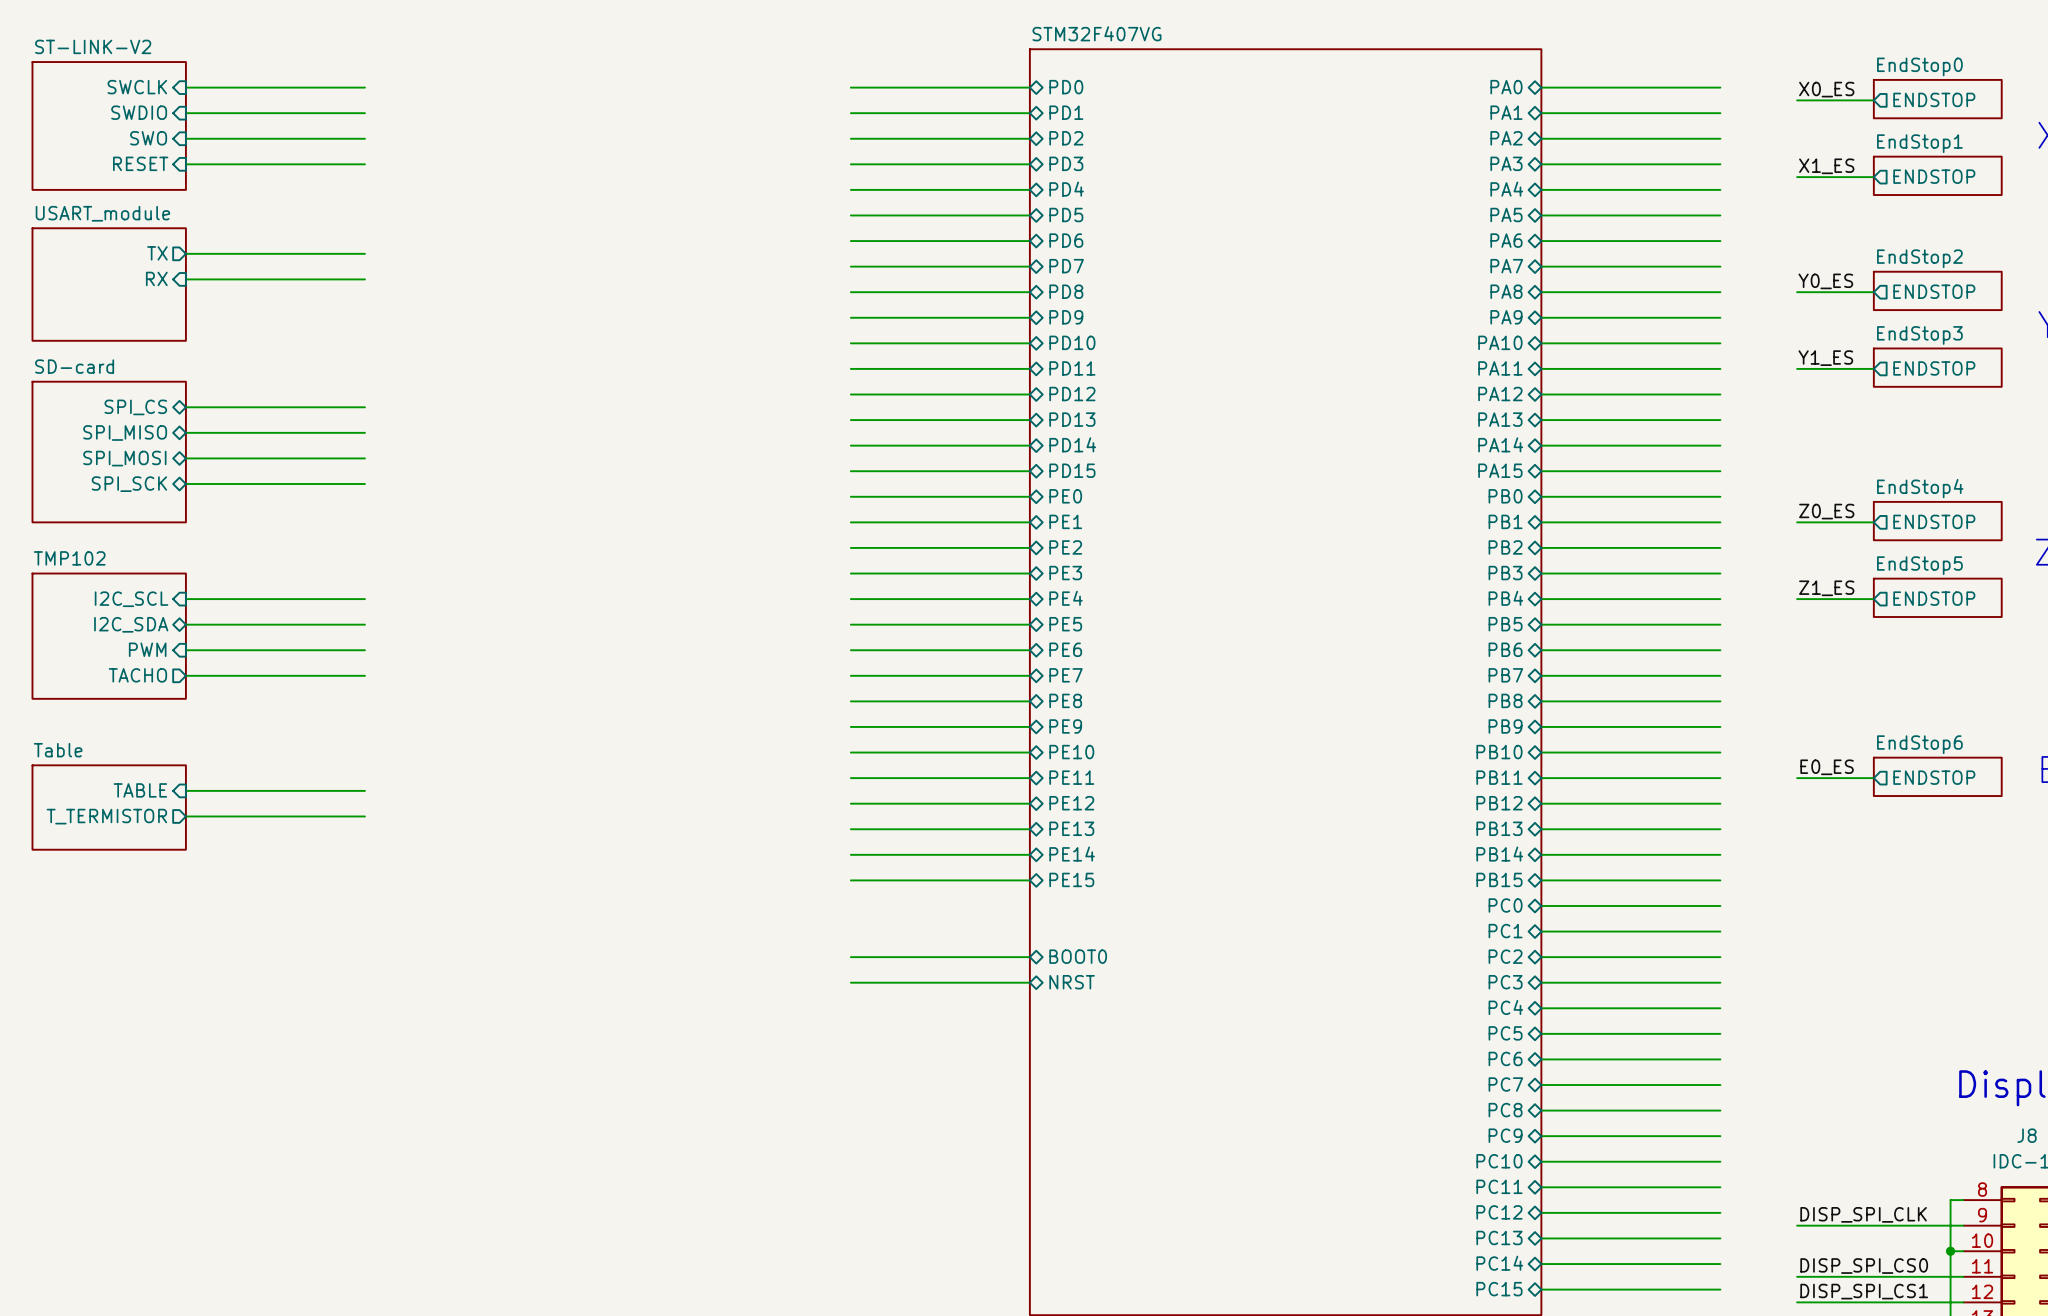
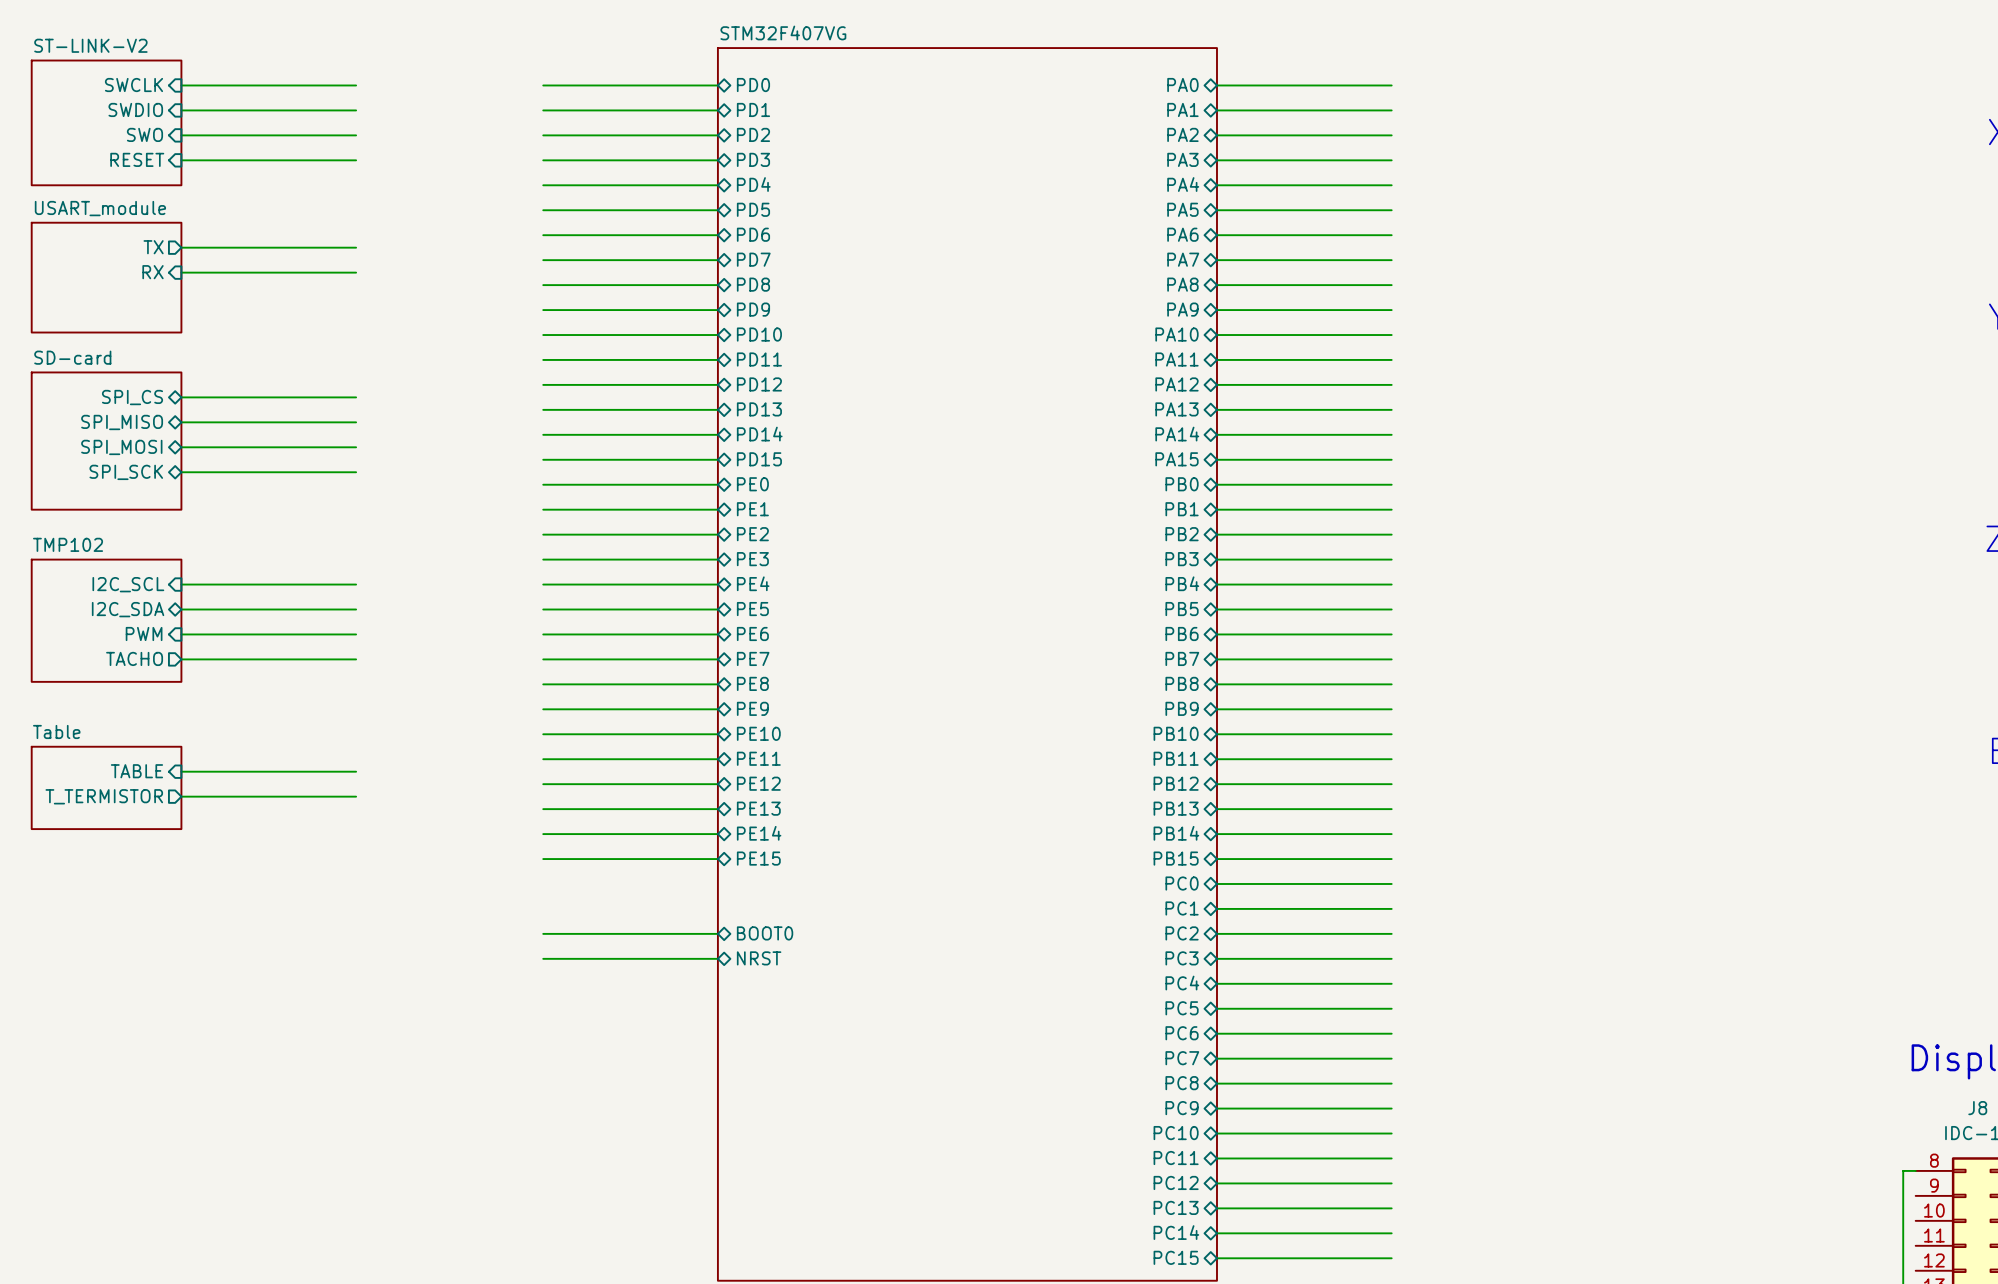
sheet STM32F407VG shape: [1029, 48, 1543, 1316] -> [717, 47, 1218, 1282]
wire: none -> (543, 85) (717, 85)
sheet pin: none -> PD0 (753, 85)
wire: (850, 87) (1029, 87) -> none
sheet pin: PD0 (1066, 87) -> none
sheet pin: none -> PA0 (1182, 85)
wire: none -> (1216, 85) (1391, 85)
sheet pin: PA0 (1506, 87) -> none
wire: (1541, 87) (1720, 87) -> none
label: X0_ES (1826, 89) -> none
sheet pin: ENDSTOP (1934, 99) -> none
sheet EndStop0: (1937, 99) -> none
wire: (1797, 100) (1873, 100) -> none
sheet pin: none -> PD1 (753, 109)
sheet pin: PD1 (1066, 112) -> none
sheet pin: none -> PA1 (1182, 109)
sheet pin: PA1 (1506, 112) -> none
wire: none -> (543, 110) (717, 110)
wire: (850, 113) (1029, 113) -> none
wire: none -> (1216, 110) (1391, 110)
wire: (1541, 113) (1720, 113) -> none
wire: none -> (543, 135) (717, 135)
sheet pin: none -> PD2 (753, 134)
wire: (850, 138) (1029, 138) -> none
sheet pin: PD2 (1066, 138) -> none
sheet pin: none -> PA2 (1182, 134)
wire: none -> (1216, 135) (1391, 135)
sheet pin: PA2 (1506, 138) -> none
wire: (1541, 138) (1720, 138) -> none
sheet pin: none -> PD3 (753, 159)
sheet pin: PD3 (1066, 163) -> none
sheet pin: none -> PA3 (1182, 159)
sheet pin: PA3 (1506, 163) -> none
wire: none -> (543, 160) (717, 160)
wire: (850, 164) (1029, 164) -> none
wire: none -> (1216, 160) (1391, 160)
wire: (1541, 164) (1720, 164) -> none
label: X1_ES (1826, 166) -> none
sheet EndStop1: (1937, 175) -> none
sheet pin: ENDSTOP (1934, 176) -> none
wire: (1797, 177) (1873, 177) -> none
wire: none -> (543, 185) (717, 185)
sheet pin: none -> PD4 (753, 184)
wire: (850, 189) (1029, 189) -> none
sheet pin: PD4 (1066, 189) -> none
sheet pin: none -> PA4 (1183, 184)
wire: none -> (1216, 185) (1391, 185)
sheet pin: PA4 (1506, 189) -> none
wire: (1541, 189) (1720, 189) -> none
wire: none -> (543, 210) (717, 210)
sheet pin: none -> PD5 (753, 209)
wire: (850, 215) (1029, 215) -> none
sheet pin: PD5 (1066, 215) -> none
sheet pin: none -> PA5 (1182, 209)
wire: none -> (1216, 210) (1391, 210)
sheet pin: PA5 (1506, 215) -> none
wire: (1541, 215) (1720, 215) -> none
sheet pin: none -> PD6 (753, 234)
sheet pin: PD6 (1066, 240) -> none
sheet pin: none -> PA6 (1182, 234)
sheet pin: PA6 (1506, 240) -> none
wire: none -> (543, 235) (717, 235)
wire: (850, 241) (1029, 241) -> none
wire: none -> (1216, 235) (1391, 235)
wire: (1541, 241) (1720, 241) -> none
wire: none -> (543, 260) (717, 260)
sheet pin: none -> PD7 (753, 259)
wire: (850, 266) (1029, 266) -> none
sheet pin: PD7 (1066, 266) -> none
sheet pin: none -> PA7 (1183, 259)
wire: none -> (1216, 260) (1391, 260)
sheet pin: PA7 (1506, 266) -> none
wire: (1541, 266) (1720, 266) -> none
label: Y0_ES (1825, 281) -> none
sheet EndStop2: (1937, 290) -> none
sheet pin: none -> PD8 (753, 284)
sheet pin: PD8 (1066, 291) -> none
sheet pin: none -> PA8 (1182, 284)
sheet pin: PA8 (1506, 291) -> none
sheet pin: ENDSTOP (1934, 291) -> none
wire: none -> (543, 285) (717, 285)
wire: (850, 292) (1029, 292) -> none
wire: none -> (1216, 285) (1391, 285)
wire: (1541, 292) (1720, 292) -> none
wire: (1797, 292) (1873, 292) -> none
wire: none -> (543, 310) (717, 310)
sheet pin: none -> PD9 (753, 309)
wire: (850, 317) (1029, 317) -> none
sheet pin: PD9 (1066, 317) -> none
sheet pin: none -> PA9 (1182, 309)
wire: none -> (1216, 310) (1391, 310)
sheet pin: PA9 (1506, 317) -> none
wire: (1541, 317) (1720, 317) -> none
sheet pin: none -> PD10 (759, 334)
sheet pin: PD10 (1072, 342) -> none
sheet pin: none -> PA10 (1176, 334)
sheet pin: PA10 (1500, 342) -> none
wire: none -> (543, 335) (717, 335)
wire: (850, 343) (1029, 343) -> none
wire: none -> (1216, 335) (1391, 335)
wire: (1541, 343) (1720, 343) -> none
label: Y1_ES (1825, 358) -> none
sheet EndStop3: (1937, 367) -> none
wire: none -> (543, 359) (717, 359)
sheet pin: none -> PD11 (759, 359)
wire: (850, 368) (1029, 368) -> none
sheet pin: PD11 (1072, 368) -> none
sheet pin: none -> PA11 (1176, 359)
wire: none -> (1216, 359) (1391, 359)
sheet pin: PA11 (1500, 368) -> none
wire: (1541, 368) (1720, 368) -> none
wire: (1797, 368) (1873, 368) -> none
sheet pin: ENDSTOP (1934, 368) -> none
wire: none -> (543, 384) (717, 384)
sheet pin: none -> PD12 (759, 384)
wire: (850, 394) (1029, 394) -> none
sheet pin: PD12 (1072, 394) -> none
sheet pin: none -> PA12 (1176, 384)
wire: none -> (1216, 384) (1391, 384)
sheet pin: PA12 (1500, 394) -> none
wire: (1541, 394) (1720, 394) -> none
sheet pin: none -> PD13 (759, 409)
sheet pin: PD13 (1072, 419) -> none
sheet pin: none -> PA13 (1176, 409)
sheet pin: PA13 (1500, 419) -> none
wire: none -> (543, 409) (717, 409)
wire: (850, 420) (1029, 420) -> none
wire: none -> (1216, 409) (1391, 409)
wire: (1541, 420) (1720, 420) -> none
sheet pin: none -> PD14 (759, 434)
sheet pin: PD14 (1072, 444) -> none
sheet pin: none -> PA14 (1177, 434)
sheet pin: PA14 (1500, 444) -> none
wire: none -> (543, 434) (717, 434)
wire: (850, 445) (1029, 445) -> none
wire: none -> (1216, 434) (1391, 434)
wire: (1541, 445) (1720, 445) -> none
sheet pin: none -> PD15 (759, 459)
sheet pin: PD15 (1072, 470) -> none
sheet pin: none -> PA15 (1176, 459)
sheet pin: PA15 (1500, 470) -> none
wire: none -> (543, 459) (717, 459)
wire: (850, 471) (1029, 471) -> none
wire: none -> (1216, 459) (1391, 459)
wire: (1541, 471) (1720, 471) -> none
wire: none -> (543, 484) (717, 484)
sheet pin: none -> PE0 (752, 484)
wire: (850, 496) (1029, 496) -> none
sheet pin: PE0 (1065, 496) -> none
sheet pin: none -> PB0 (1182, 484)
wire: none -> (1216, 484) (1391, 484)
sheet pin: PB0 (1505, 496) -> none
wire: (1541, 496) (1720, 496) -> none
label: Z0_ES (1826, 511) -> none
sheet pin: none -> PE1 (752, 509)
sheet pin: PE1 (1065, 521) -> none
sheet pin: none -> PB1 (1182, 509)
sheet pin: PB1 (1505, 521) -> none
sheet pin: ENDSTOP (1934, 521) -> none
sheet EndStop4: (1937, 521) -> none
wire: none -> (543, 509) (717, 509)
wire: (850, 522) (1029, 522) -> none
wire: none -> (1216, 509) (1391, 509)
wire: (1541, 522) (1720, 522) -> none
wire: (1797, 522) (1873, 522) -> none
wire: none -> (543, 534) (717, 534)
sheet pin: none -> PE2 (752, 534)
wire: (850, 547) (1029, 547) -> none
sheet pin: PE2 (1065, 547) -> none
sheet pin: none -> PB2 (1182, 534)
wire: none -> (1216, 534) (1391, 534)
sheet pin: PB2 (1505, 547) -> none
wire: (1541, 547) (1720, 547) -> none
wire: none -> (543, 559) (717, 559)
sheet pin: none -> PE3 (752, 559)
wire: (850, 573) (1029, 573) -> none
sheet pin: PE3 (1065, 573) -> none
sheet pin: none -> PB3 (1182, 559)
wire: none -> (1216, 559) (1391, 559)
sheet pin: PB3 (1505, 573) -> none
wire: (1541, 573) (1720, 573) -> none
label: Z1_ES (1826, 588) -> none
sheet EndStop5: (1937, 597) -> none
sheet pin: none -> PE4 (753, 583)
sheet pin: PE4 (1066, 598) -> none
sheet pin: none -> PB4 (1182, 583)
sheet pin: PB4 (1505, 598) -> none
sheet pin: ENDSTOP (1934, 598) -> none
wire: none -> (543, 584) (717, 584)
wire: (850, 599) (1029, 599) -> none
wire: none -> (1216, 584) (1391, 584)
wire: (1541, 599) (1720, 599) -> none
wire: (1797, 599) (1873, 599) -> none
wire: none -> (543, 609) (717, 609)
sheet pin: none -> PE5 (752, 609)
wire: (850, 624) (1029, 624) -> none
sheet pin: PE5 (1065, 624) -> none
sheet pin: none -> PB5 (1182, 609)
wire: none -> (1216, 609) (1391, 609)
sheet pin: PB5 (1505, 624) -> none
wire: (1541, 624) (1720, 624) -> none
sheet pin: none -> PE6 (752, 633)
sheet pin: PE6 (1065, 649) -> none
sheet pin: none -> PB6 (1182, 633)
sheet pin: PB6 (1505, 649) -> none
wire: none -> (543, 634) (717, 634)
wire: (850, 650) (1029, 650) -> none
wire: none -> (1216, 634) (1391, 634)
wire: (1541, 650) (1720, 650) -> none
wire: none -> (543, 659) (717, 659)
sheet pin: none -> PE7 (753, 658)
wire: (850, 675) (1029, 675) -> none
sheet pin: PE7 (1066, 675) -> none
sheet pin: none -> PB7 (1182, 658)
wire: none -> (1216, 659) (1391, 659)
sheet pin: PB7 (1505, 675) -> none
wire: (1541, 675) (1720, 675) -> none
sheet pin: none -> PE8 (752, 683)
sheet pin: PE8 (1065, 700) -> none
sheet pin: none -> PB8 (1182, 683)
sheet pin: PB8 (1505, 700) -> none
wire: none -> (543, 684) (717, 684)
wire: (850, 701) (1029, 701) -> none
wire: none -> (1216, 684) (1391, 684)
wire: (1541, 701) (1720, 701) -> none
wire: none -> (543, 709) (717, 709)
sheet pin: none -> PE9 (752, 708)
wire: (850, 726) (1029, 726) -> none
sheet pin: PE9 (1065, 726) -> none
sheet pin: none -> PB9 (1182, 708)
wire: none -> (1216, 709) (1391, 709)
sheet pin: PB9 (1505, 726) -> none
wire: (1541, 726) (1720, 726) -> none
wire: none -> (543, 734) (717, 734)
sheet pin: none -> PE10 (758, 733)
wire: (850, 752) (1029, 752) -> none
sheet pin: PE10 (1071, 752) -> none
sheet pin: none -> PB10 (1176, 733)
wire: none -> (1216, 734) (1391, 734)
sheet pin: PB10 (1499, 752) -> none
wire: (1541, 752) (1720, 752) -> none
label: E0_ES (1827, 767) -> none
sheet EndStop6: (1937, 776) -> none
sheet pin: none -> PE11 (758, 758)
sheet pin: PE11 (1071, 777) -> none
sheet pin: none -> PB11 (1176, 758)
sheet pin: PB11 (1499, 777) -> none
sheet pin: ENDSTOP (1934, 777) -> none
wire: none -> (543, 759) (717, 759)
wire: (850, 778) (1029, 778) -> none
wire: none -> (1216, 759) (1391, 759)
wire: (1541, 778) (1720, 778) -> none
wire: (1797, 778) (1873, 778) -> none
wire: none -> (543, 784) (717, 784)
sheet pin: none -> PE12 (758, 783)
wire: (850, 803) (1029, 803) -> none
sheet pin: PE12 (1071, 803) -> none
sheet pin: none -> PB12 (1176, 783)
wire: none -> (1216, 784) (1391, 784)
sheet pin: PB12 (1499, 803) -> none
wire: (1541, 803) (1720, 803) -> none
sheet pin: none -> PE13 (758, 808)
sheet pin: PE13 (1071, 828) -> none
sheet pin: none -> PB13 (1176, 808)
sheet pin: PB13 (1499, 828) -> none
wire: none -> (543, 809) (717, 809)
wire: (850, 829) (1029, 829) -> none
wire: none -> (1216, 809) (1391, 809)
wire: (1541, 829) (1720, 829) -> none
wire: none -> (543, 834) (717, 834)
sheet pin: none -> PE14 (759, 833)
wire: (850, 854) (1029, 854) -> none
sheet pin: PE14 (1072, 854) -> none
sheet pin: none -> PB14 (1176, 833)
wire: none -> (1216, 834) (1391, 834)
sheet pin: PB14 (1499, 854) -> none
wire: (1541, 854) (1720, 854) -> none
sheet pin: none -> PE15 (758, 858)
sheet pin: PE15 (1071, 879) -> none
sheet pin: none -> PB15 (1176, 858)
sheet pin: PB15 (1499, 879) -> none
wire: none -> (543, 859) (717, 859)
wire: (850, 880) (1029, 880) -> none
wire: none -> (1216, 859) (1391, 859)
wire: (1541, 880) (1720, 880) -> none
sheet pin: none -> PC0 (1182, 883)
wire: none -> (1216, 883) (1391, 883)
sheet pin: PC0 (1505, 905) -> none
wire: (1541, 905) (1720, 905) -> none
sheet pin: none -> PC1 (1182, 908)
wire: none -> (1216, 908) (1391, 908)
sheet pin: PC1 (1505, 931) -> none
wire: (1541, 931) (1720, 931) -> none
sheet pin: none -> BOOT0 (765, 933)
sheet pin: BOOT0 (1078, 956) -> none
sheet pin: none -> PC2 (1182, 933)
sheet pin: PC2 (1505, 956) -> none
wire: none -> (543, 933) (717, 933)
wire: (850, 957) (1029, 957) -> none
wire: none -> (1216, 933) (1391, 933)
wire: (1541, 957) (1720, 957) -> none
wire: none -> (543, 958) (717, 958)
sheet pin: none -> NRST (759, 958)
wire: (850, 982) (1029, 982) -> none
sheet pin: NRST (1072, 982) -> none
sheet pin: none -> PC3 (1182, 958)
wire: none -> (1216, 958) (1391, 958)
sheet pin: PC3 (1505, 982) -> none
wire: (1541, 982) (1720, 982) -> none
sheet pin: none -> PC4 (1182, 983)
sheet pin: PC4 (1505, 1007) -> none
wire: none -> (1216, 983) (1391, 983)
wire: (1541, 1008) (1720, 1008) -> none
sheet pin: none -> PC5 (1182, 1008)
wire: none -> (1216, 1008) (1391, 1008)
sheet pin: PC5 (1505, 1033) -> none
wire: (1541, 1033) (1720, 1033) -> none
sheet pin: none -> PC6 (1182, 1033)
sheet pin: PC6 (1505, 1058) -> none
wire: none -> (1216, 1033) (1391, 1033)
wire: (1541, 1059) (1720, 1059) -> none
sheet pin: none -> PC7 (1182, 1058)
sheet pin: PC7 (1505, 1084) -> none
wire: none -> (1216, 1058) (1391, 1058)
wire: (1541, 1085) (1720, 1085) -> none
sheet pin: none -> PC8 (1182, 1083)
wire: none -> (1216, 1083) (1391, 1083)
sheet pin: PC8 (1505, 1110) -> none
wire: (1541, 1110) (1720, 1110) -> none
sheet pin: none -> PC9 (1182, 1108)
sheet pin: PC9 (1505, 1135) -> none
wire: none -> (1216, 1108) (1391, 1108)
wire: (1541, 1136) (1720, 1136) -> none
sheet pin: none -> PC10 (1176, 1133)
wire: none -> (1216, 1133) (1391, 1133)
sheet pin: PC10 (1499, 1161) -> none
wire: (1541, 1161) (1720, 1161) -> none
sheet pin: none -> PC11 (1176, 1158)
sheet pin: PC11 (1499, 1186) -> none
wire: none -> (1216, 1158) (1391, 1158)
wire: (1541, 1187) (1720, 1187) -> none
sheet pin: none -> PC12 (1176, 1182)
wire: none -> (1216, 1183) (1391, 1183)
sheet pin: PC12 (1499, 1212) -> none
wire: (1541, 1212) (1720, 1212) -> none
label: DISP_SPI_CLK (1863, 1214) -> none
wire: (1797, 1225) (1963, 1225) -> none
sheet pin: none -> PC13 (1176, 1207)
sheet pin: PC13 (1499, 1237) -> none
wire: none -> (1216, 1208) (1391, 1208)
wire: (1541, 1238) (1720, 1238) -> none
wire: (1950, 1251) (1963, 1251) -> none
junction: (1950, 1251) -> none
sheet pin: none -> PC14 (1176, 1232)
sheet pin: PC14 (1499, 1263) -> none
wire: none -> (1216, 1233) (1391, 1233)
wire: (1541, 1264) (1720, 1264) -> none
label: DISP_SPI_CS0 (1864, 1266) -> none
wire: (1797, 1276) (1963, 1276) -> none
sheet pin: none -> PC15 (1176, 1257)
wire: none -> (1216, 1258) (1391, 1258)
sheet pin: PC15 (1499, 1289) -> none
wire: (1541, 1289) (1720, 1289) -> none
label: DISP_SPI_CS1 (1864, 1291) -> none
wire: (1797, 1302) (1963, 1302) -> none

